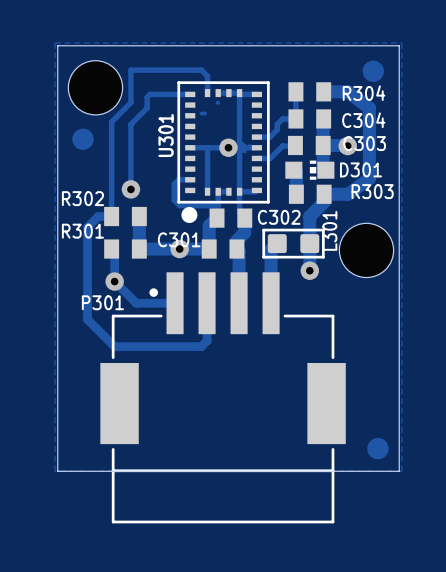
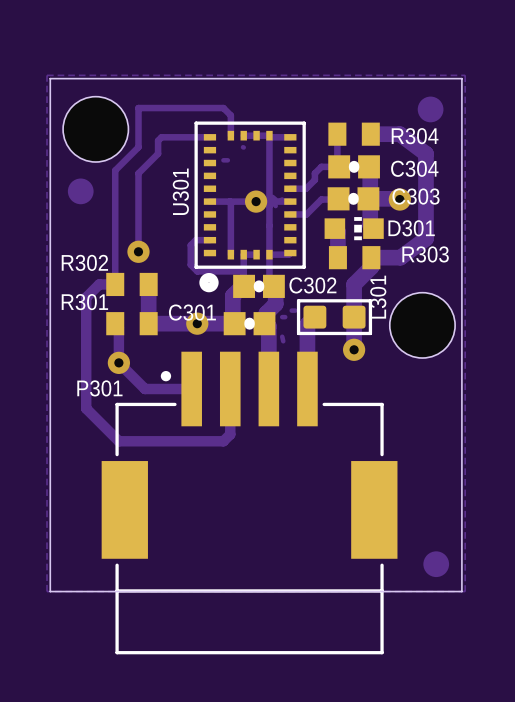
C304 footprint: [288, 109, 332, 129] -> [328, 155, 380, 179]
C303 footprint: [287, 135, 331, 156] -> [327, 187, 380, 211]
C302 footprint: [209, 208, 253, 228] -> [233, 274, 285, 298]
track: none -> (291, 310) (295, 310)
C301 footprint: [201, 239, 245, 259] -> [223, 312, 276, 336]
track: none -> (282, 317) (285, 317)
track: none -> (282, 336) (283, 341)

